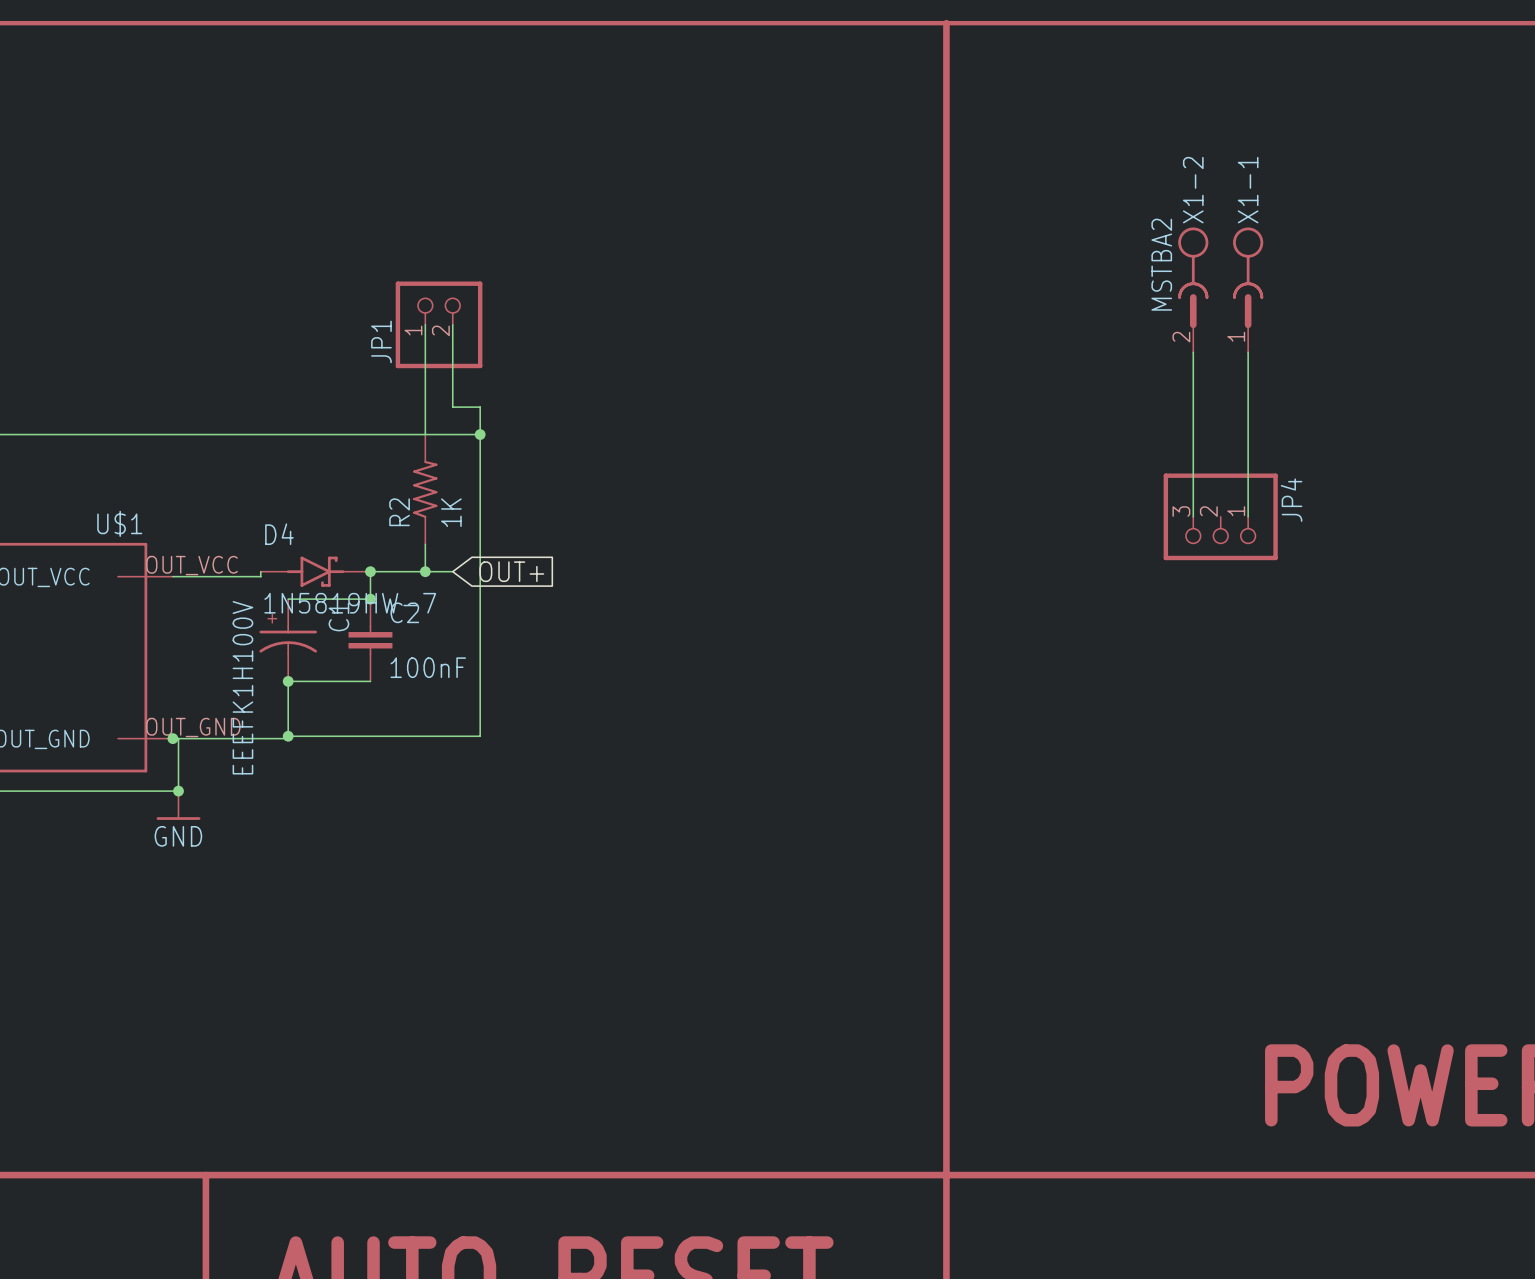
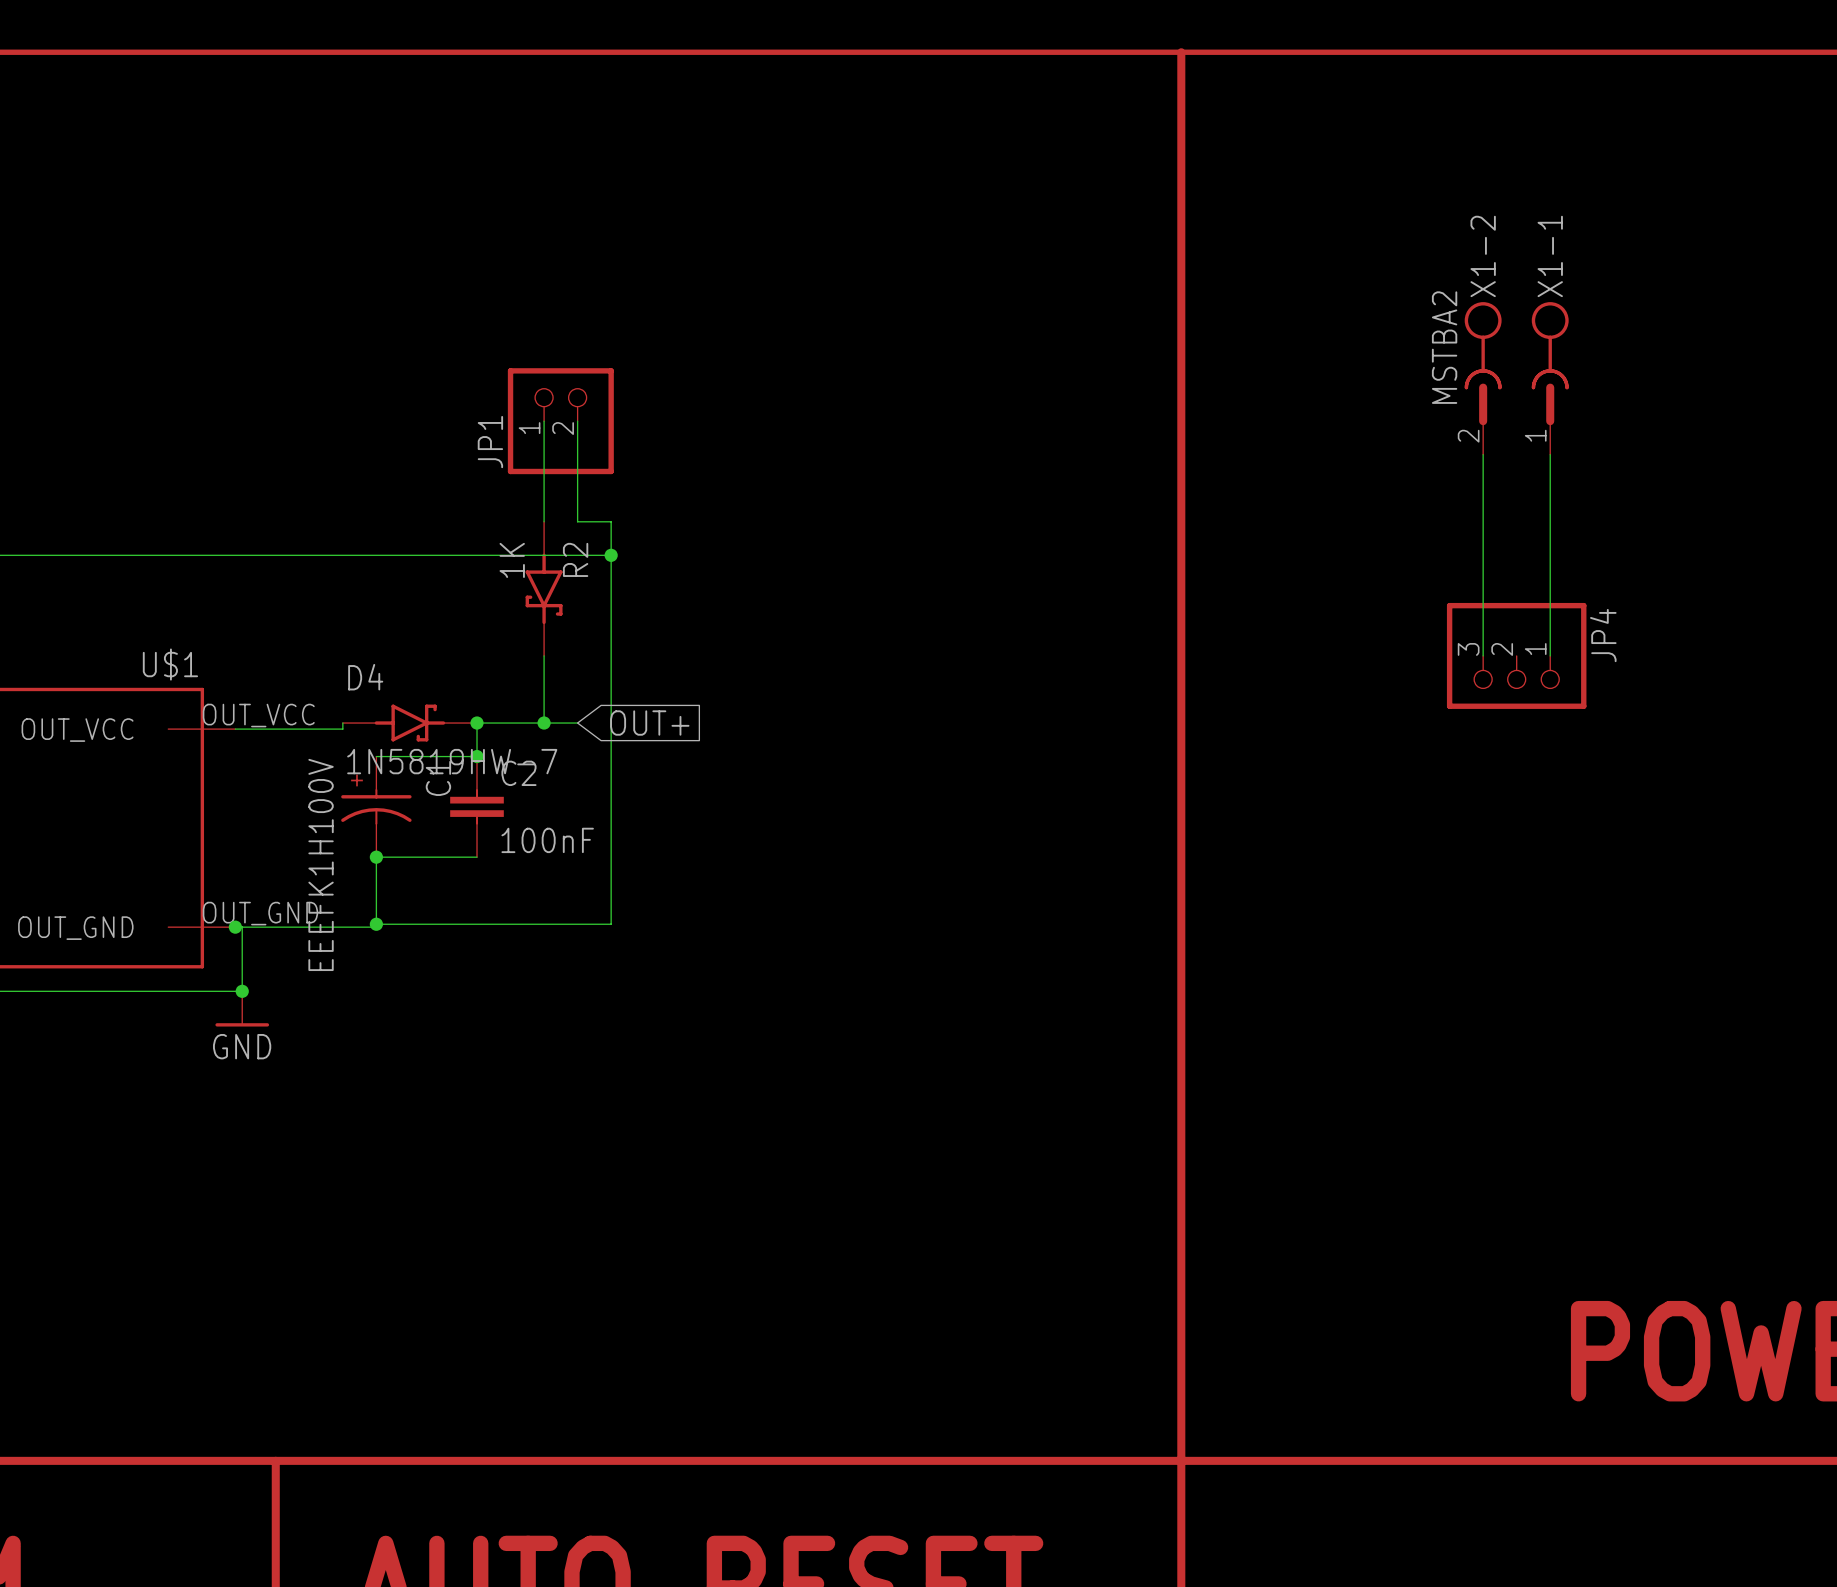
R2 symbol: [413, 434, 438, 545] -> [525, 521, 563, 656]
R2 name position: R2 (399, 512) -> R2 (575, 559)
R2 value position: 1K (451, 512) -> 1K (512, 560)

